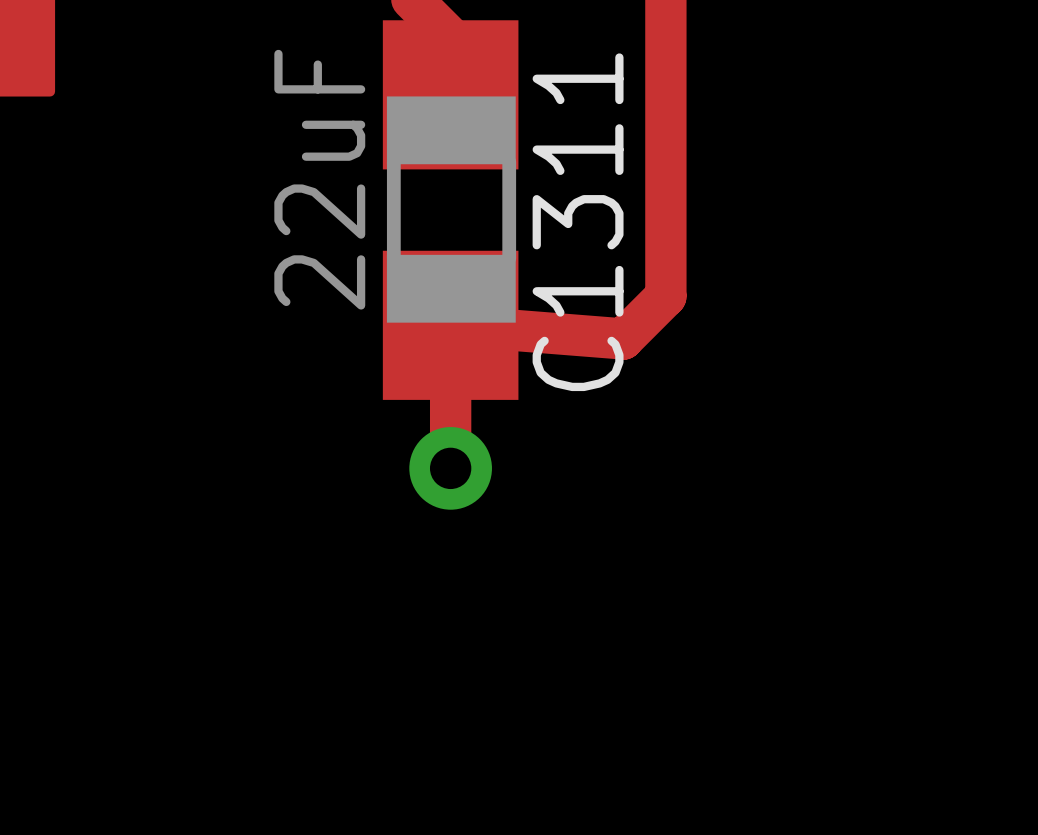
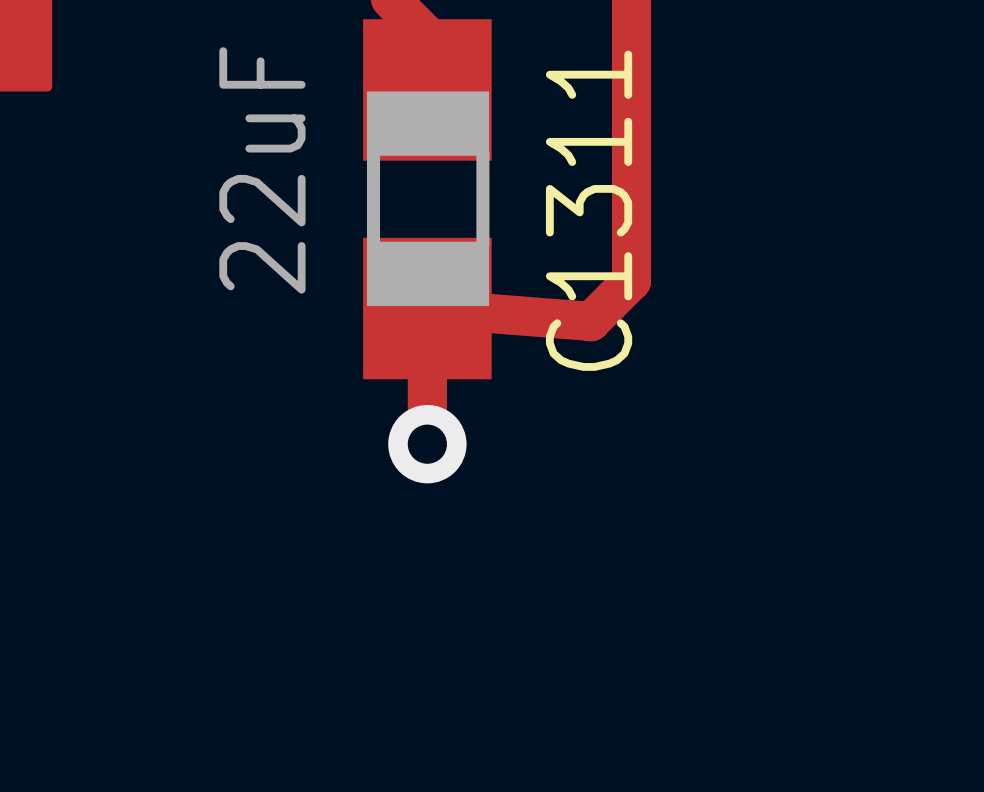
C1311 value position: 22uF (319, 179) -> 22uF (262, 170)
C1311 name position: C1311 (578, 222) -> C1311 (589, 210)

